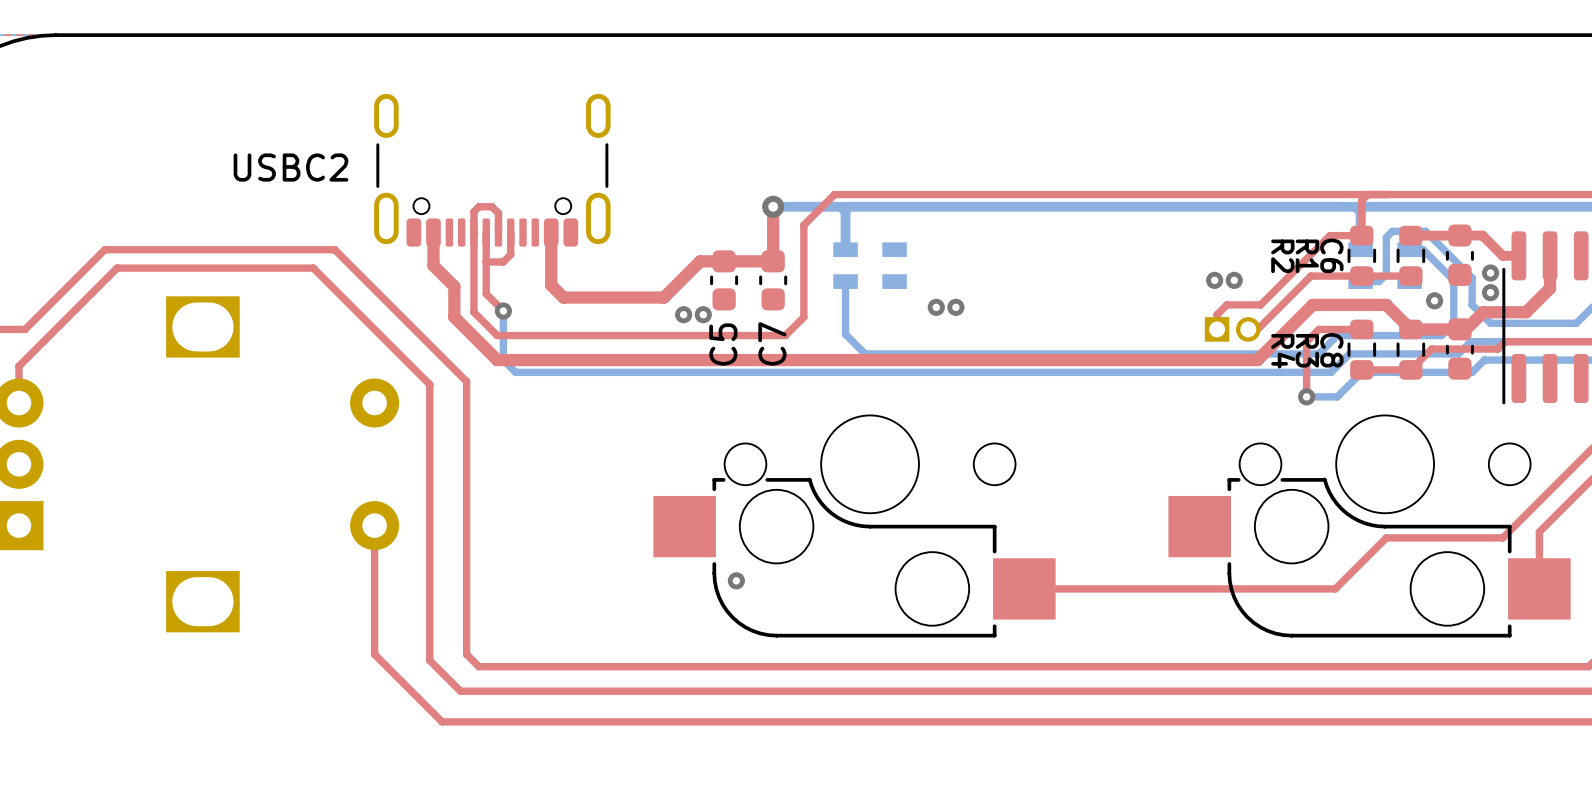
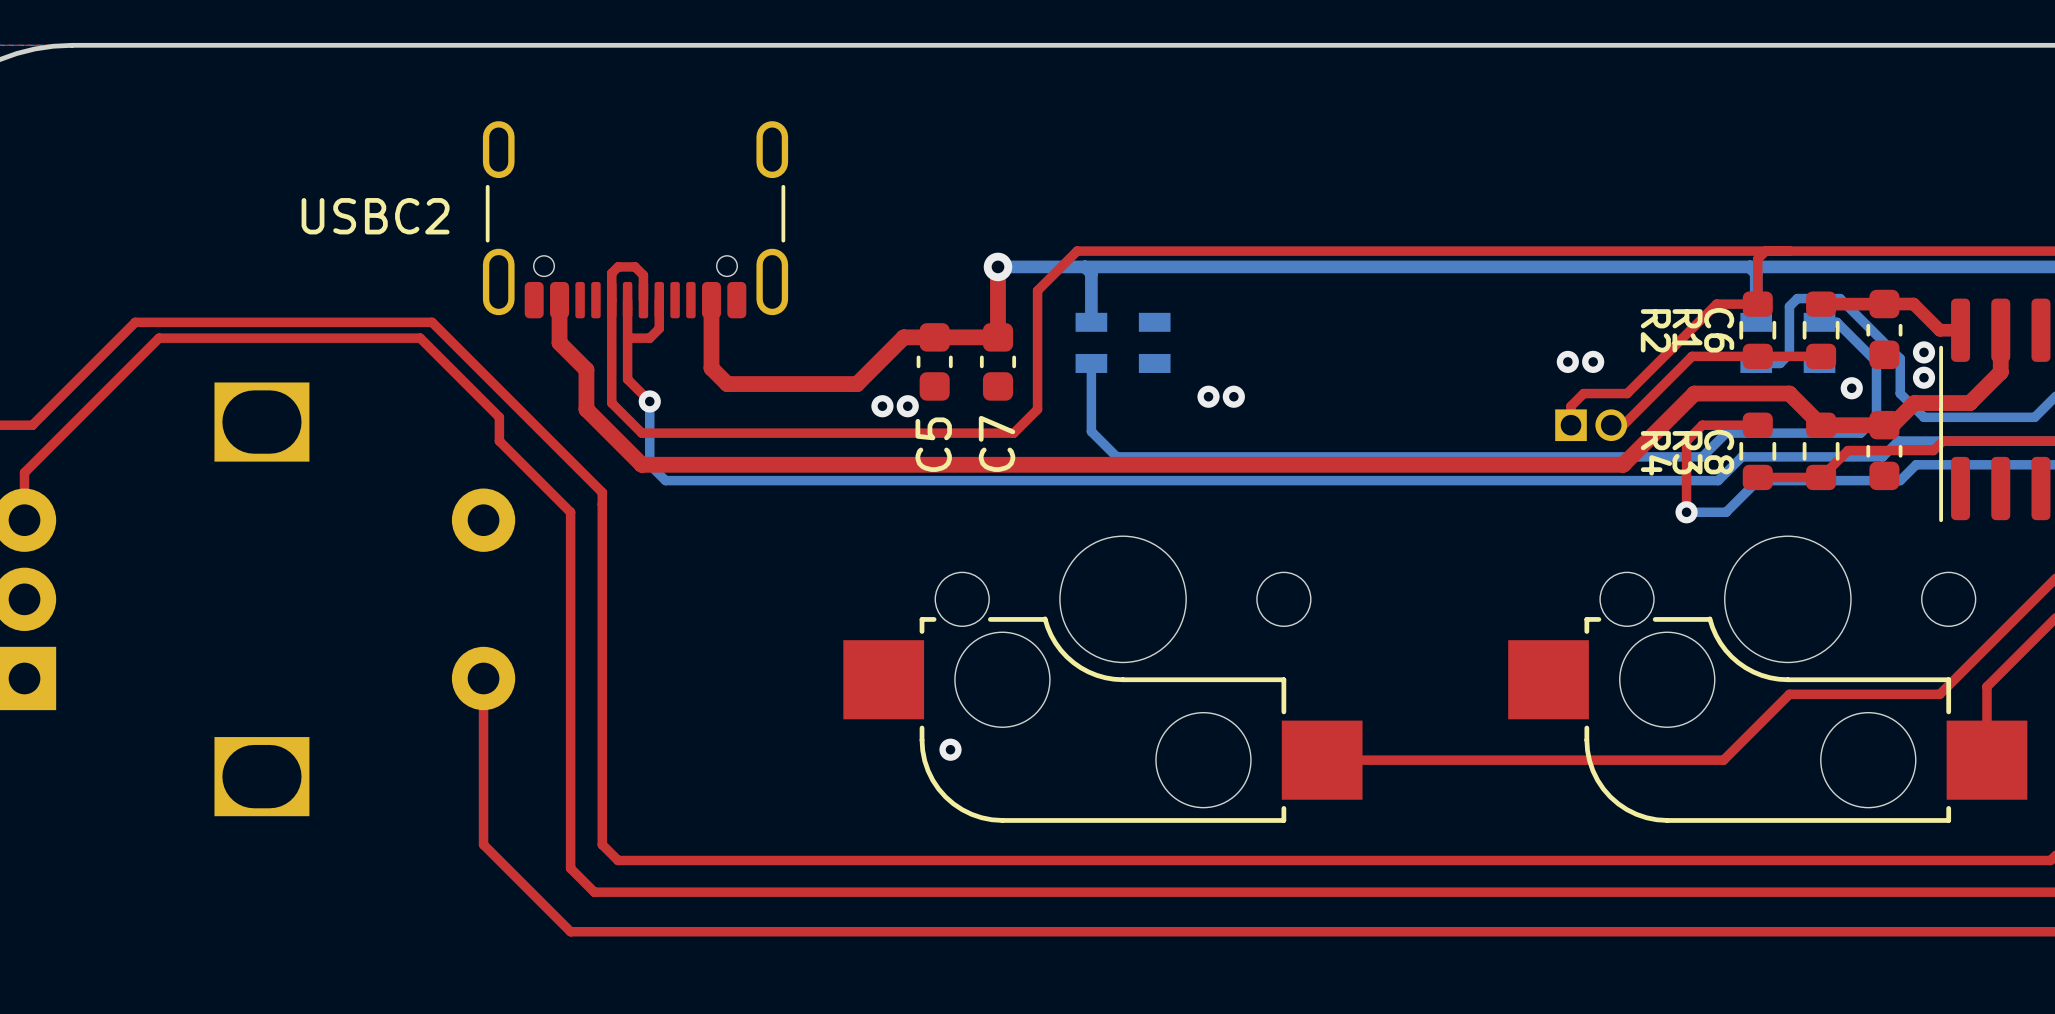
top track: (117, 268) (313, 268) (386, 341) -> (151, 346) (159, 338) (420, 338) (499, 417) (499, 441)
top track: (429, 384) (429, 660) (442, 672) -> (554, 496) (570, 512) (570, 868)

